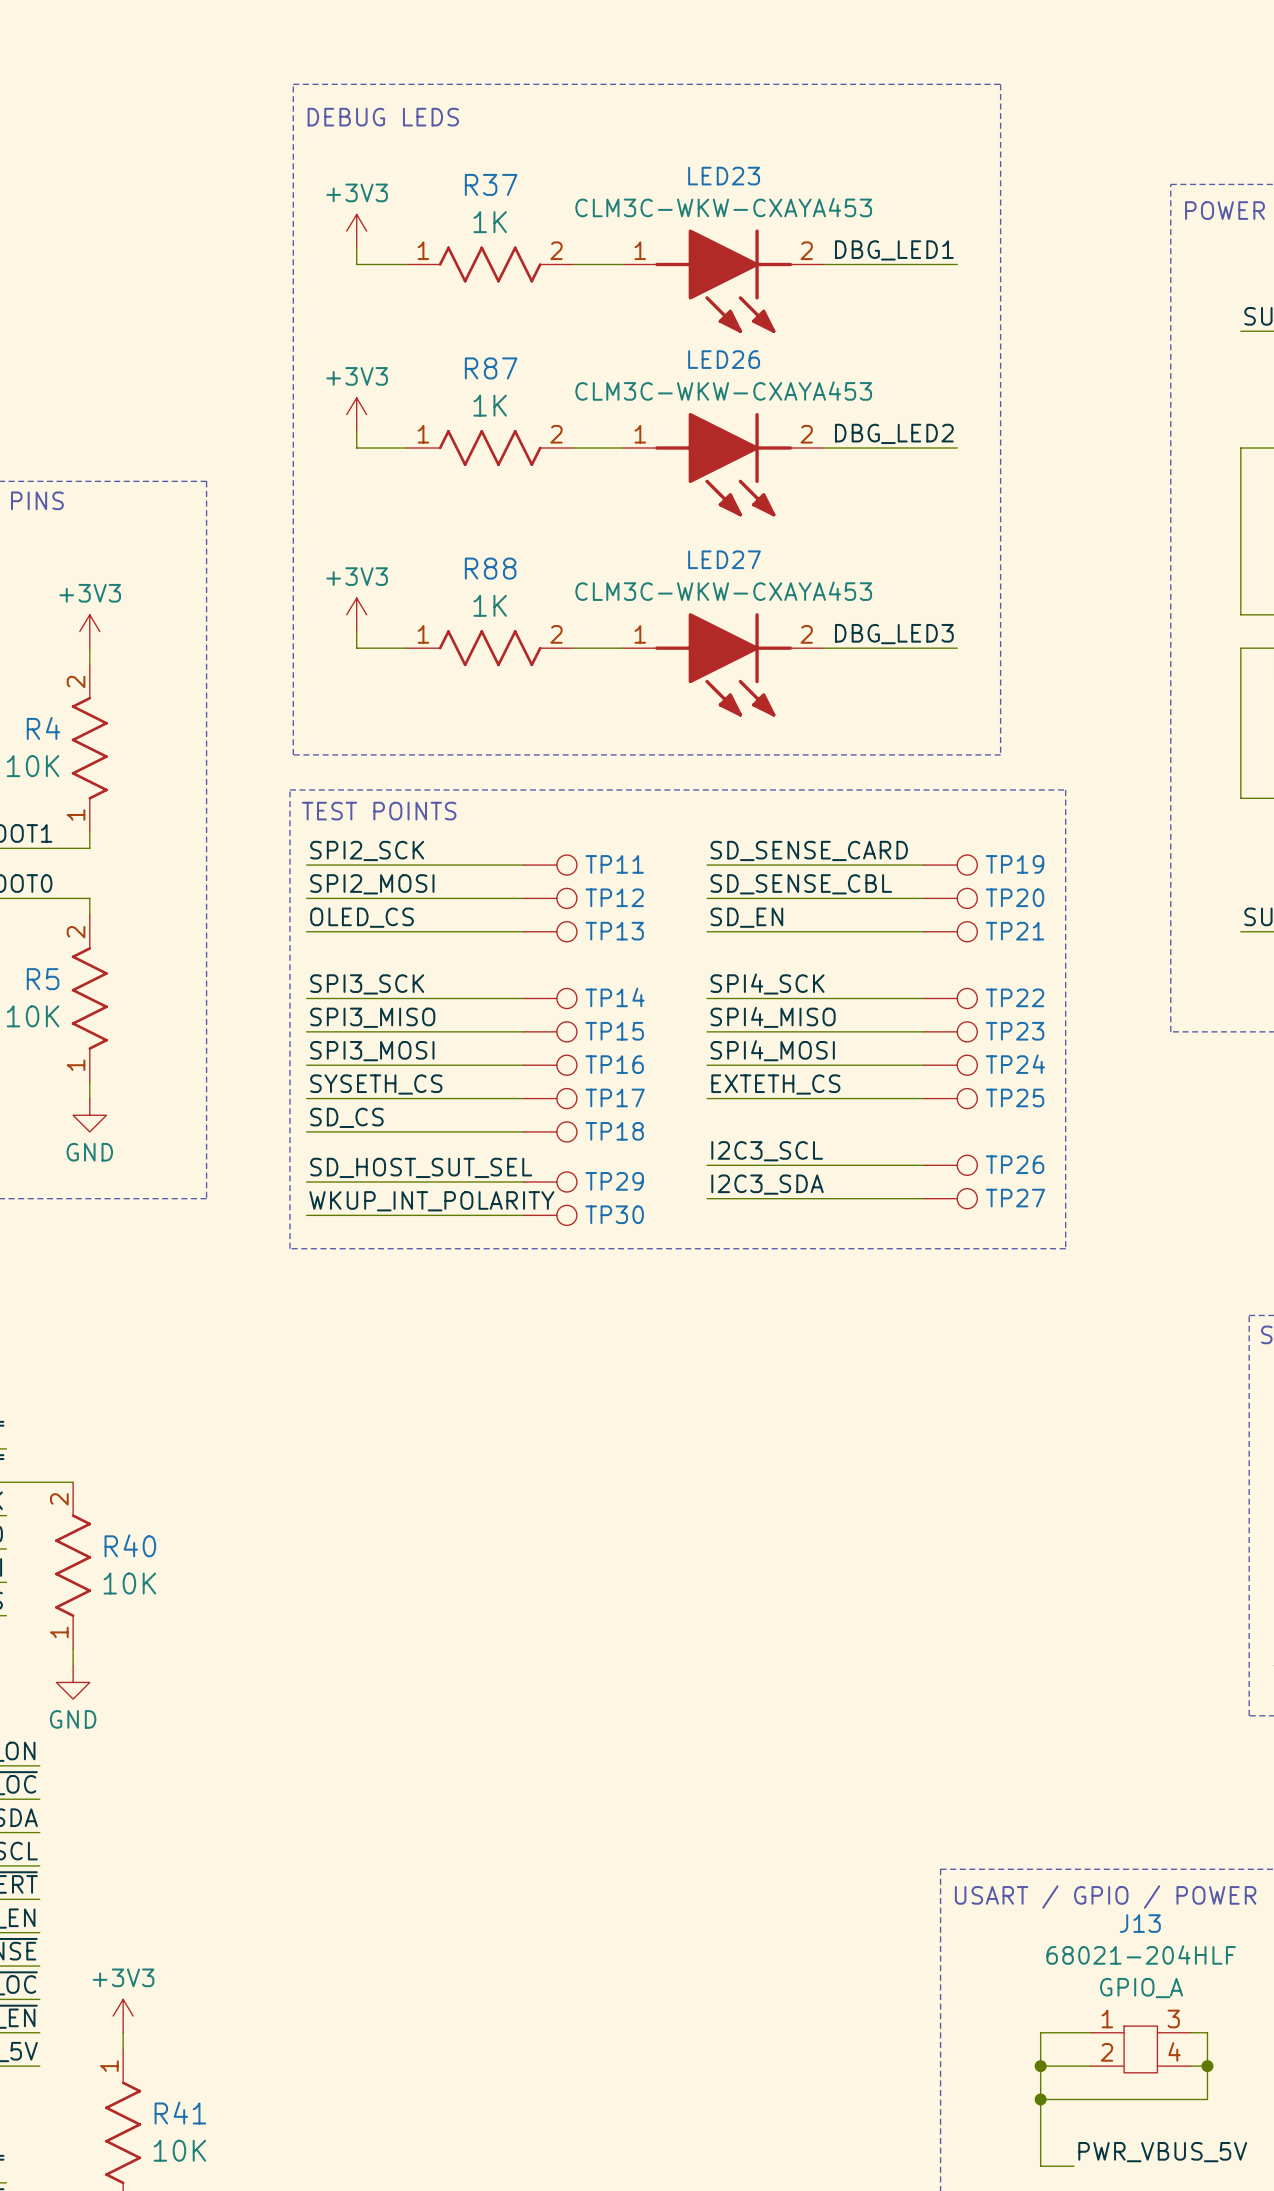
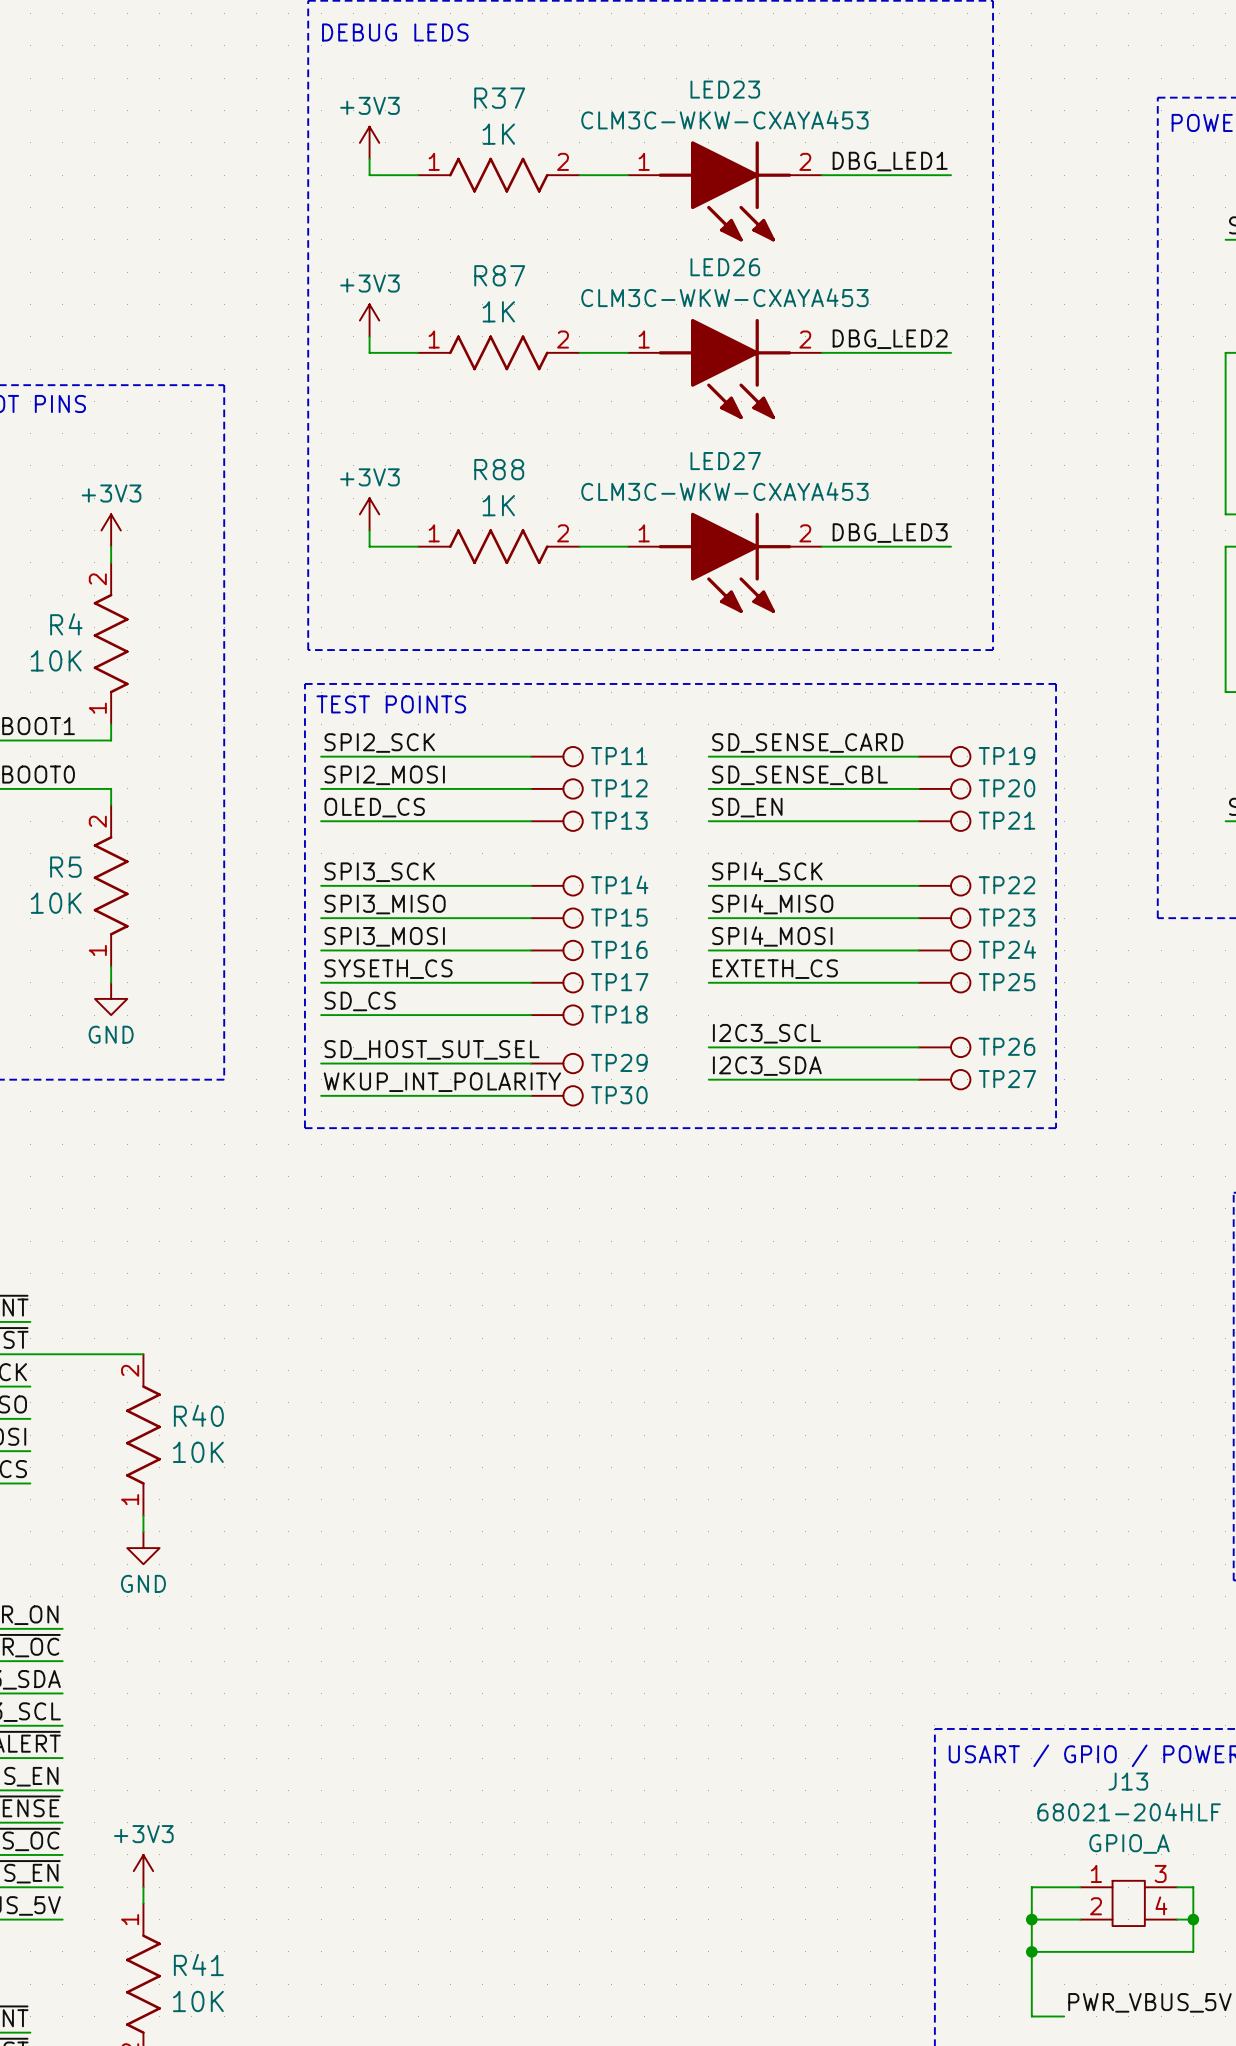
wire: none -> (94, 1354) (143, 1354)
R40 position: (73, 1565) -> (143, 1435)
wire: (73, 1649) (73, 1665) -> (143, 1515) (143, 1531)
power symbol position: GND (73, 1682) -> GND (143, 1548)

